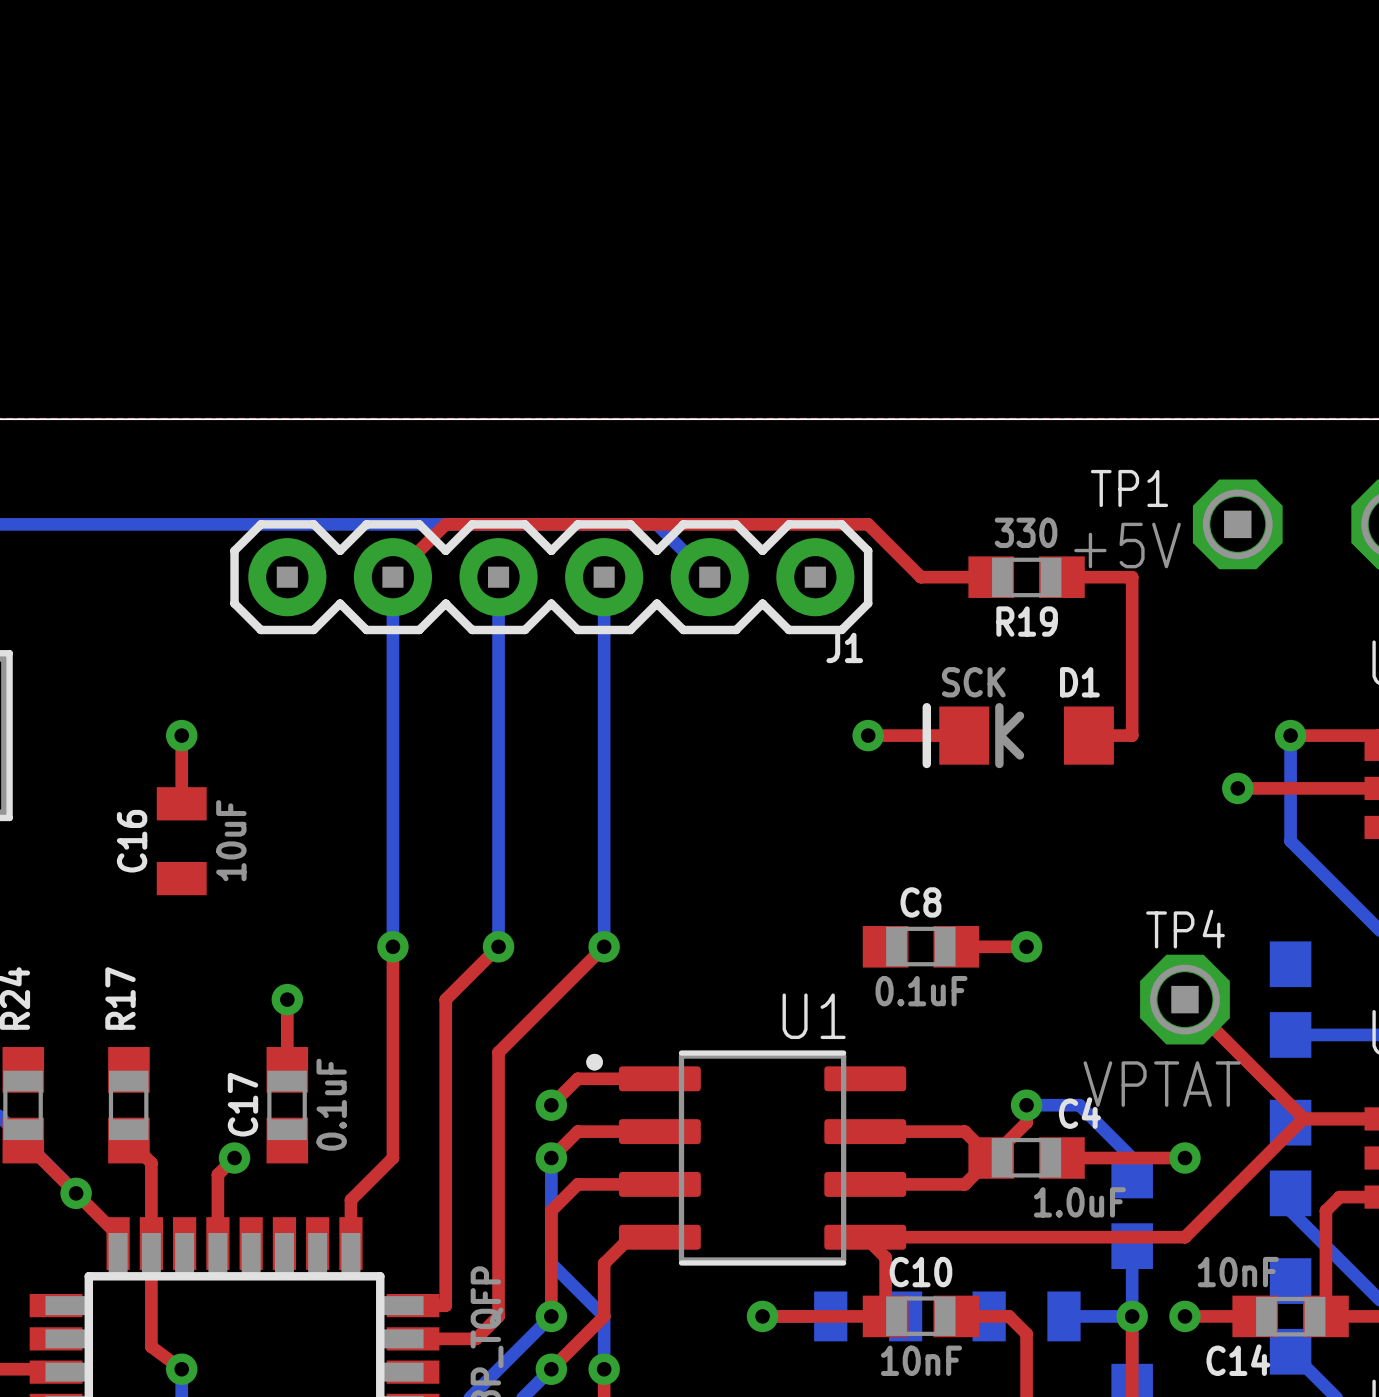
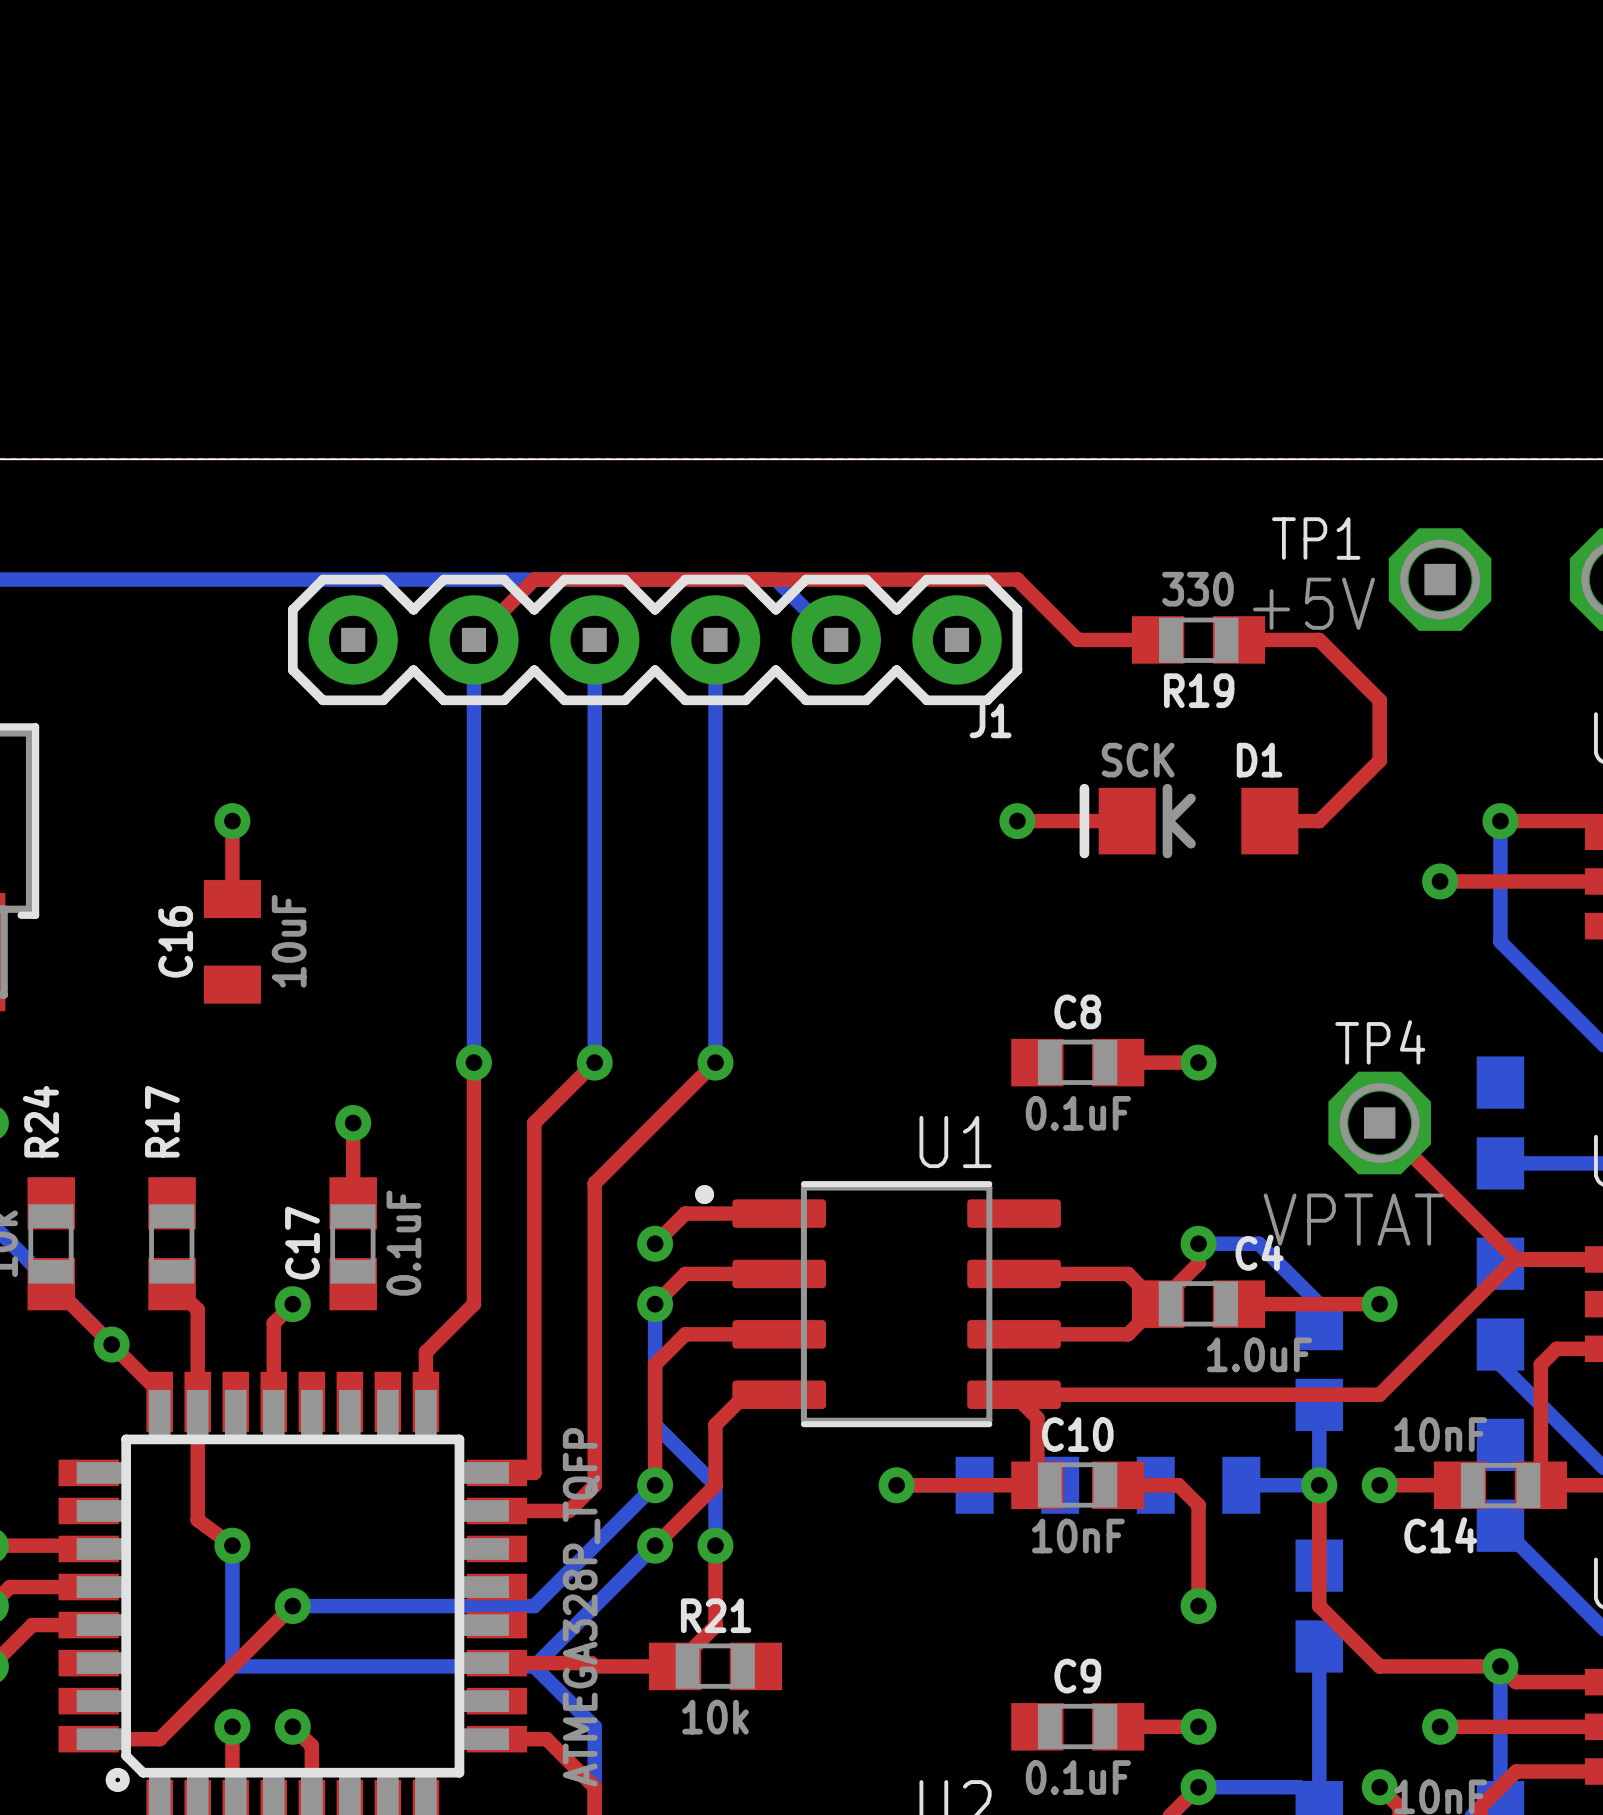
top track: (1132, 577) (1132, 735) -> (1319, 639) (1379, 700) (1379, 760) (1319, 821)

